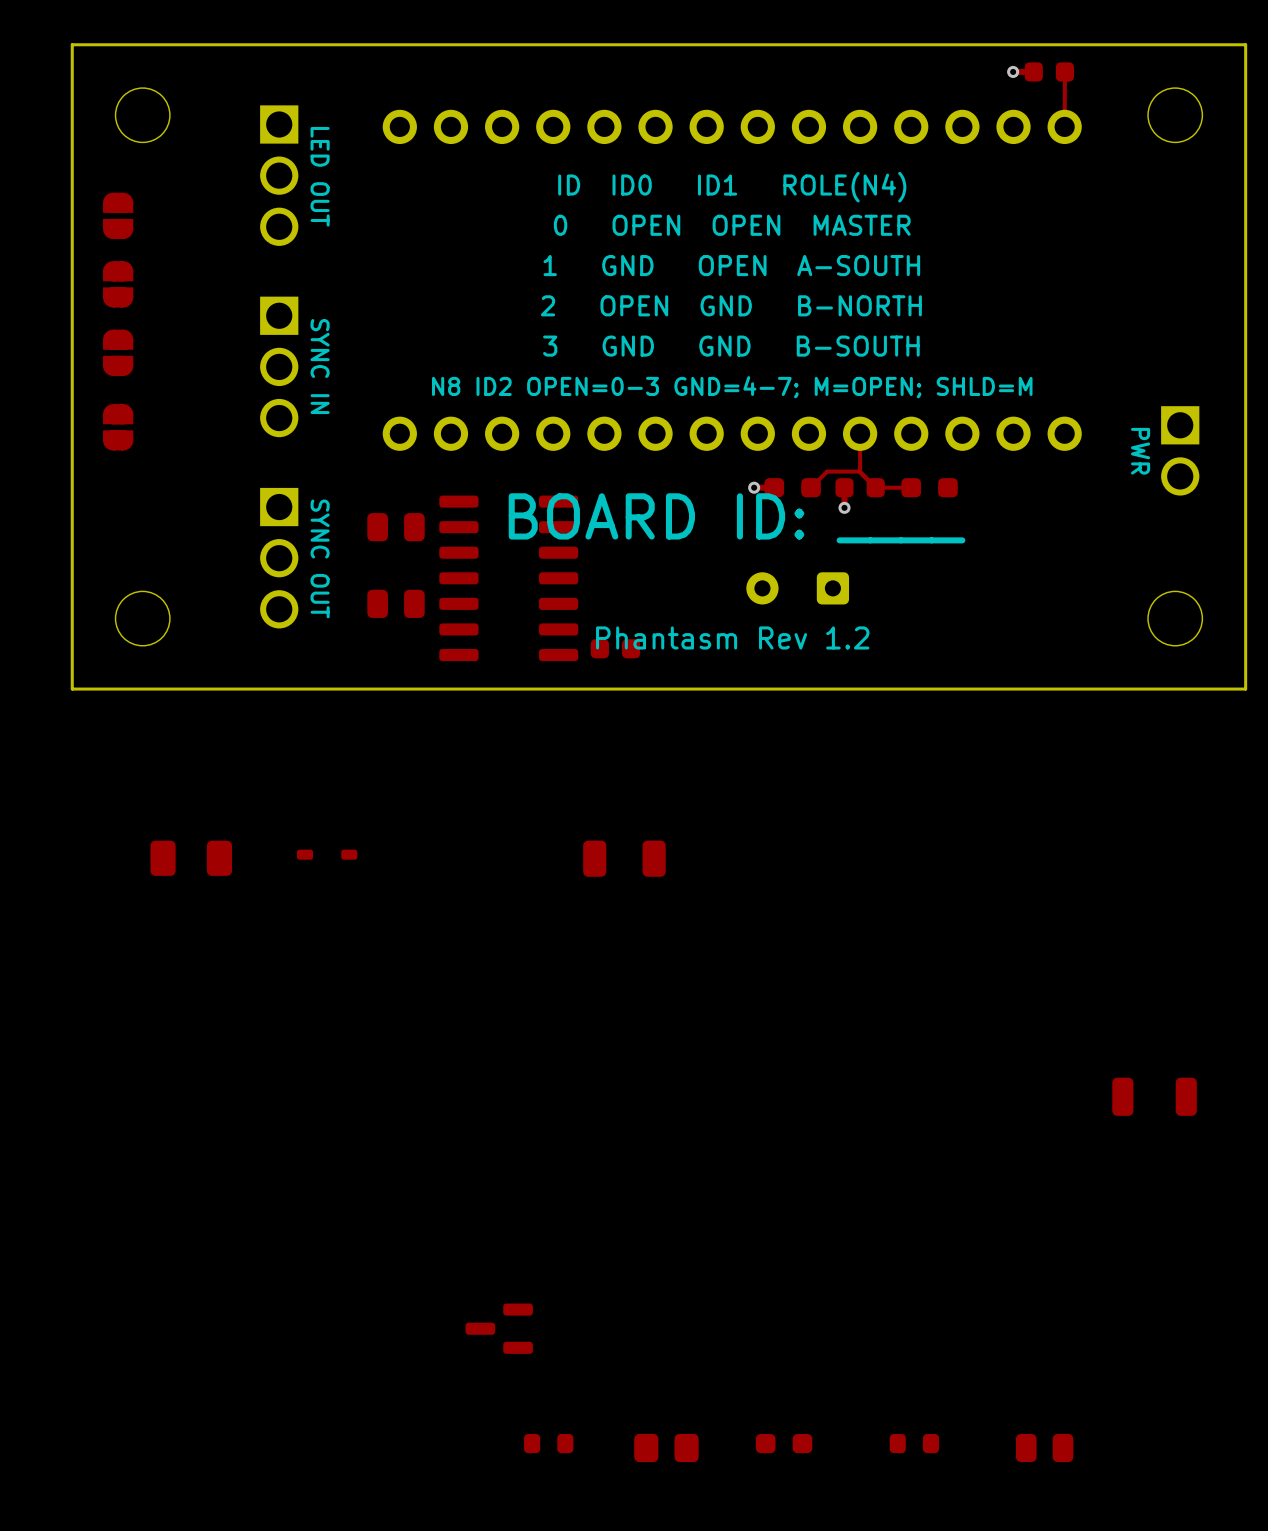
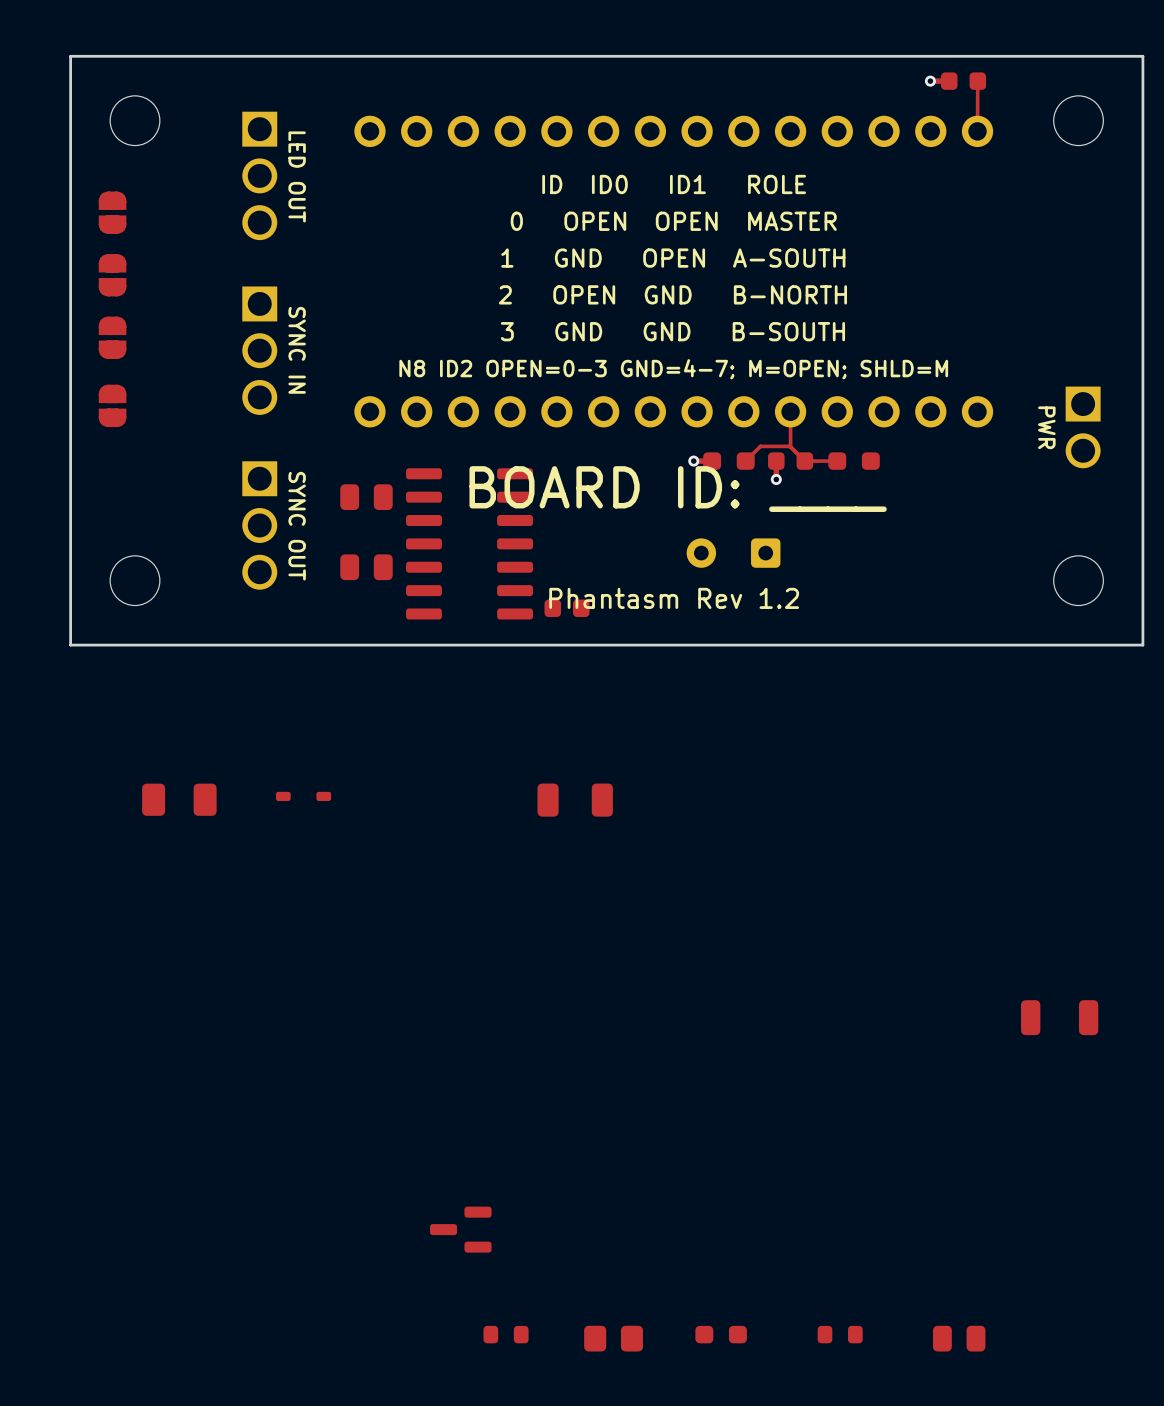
text: ID ID0 ID1 ROLE(N4) (732, 187) -> ID ID0 ID1 ROLE (674, 184)

